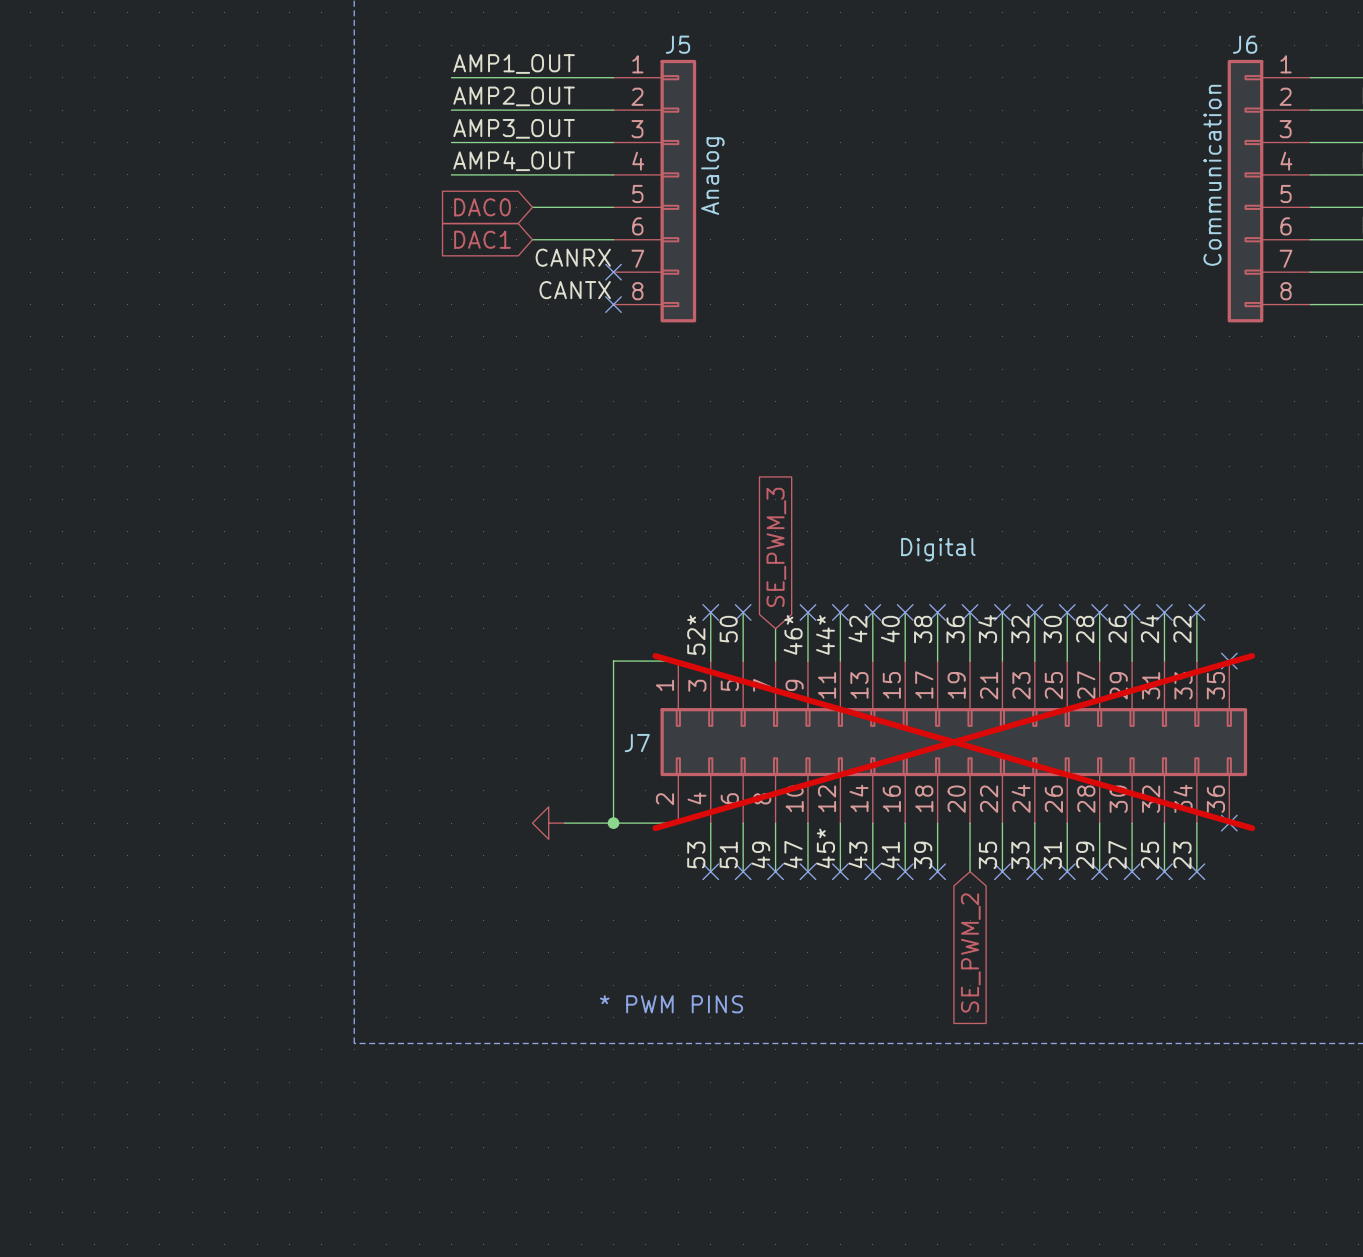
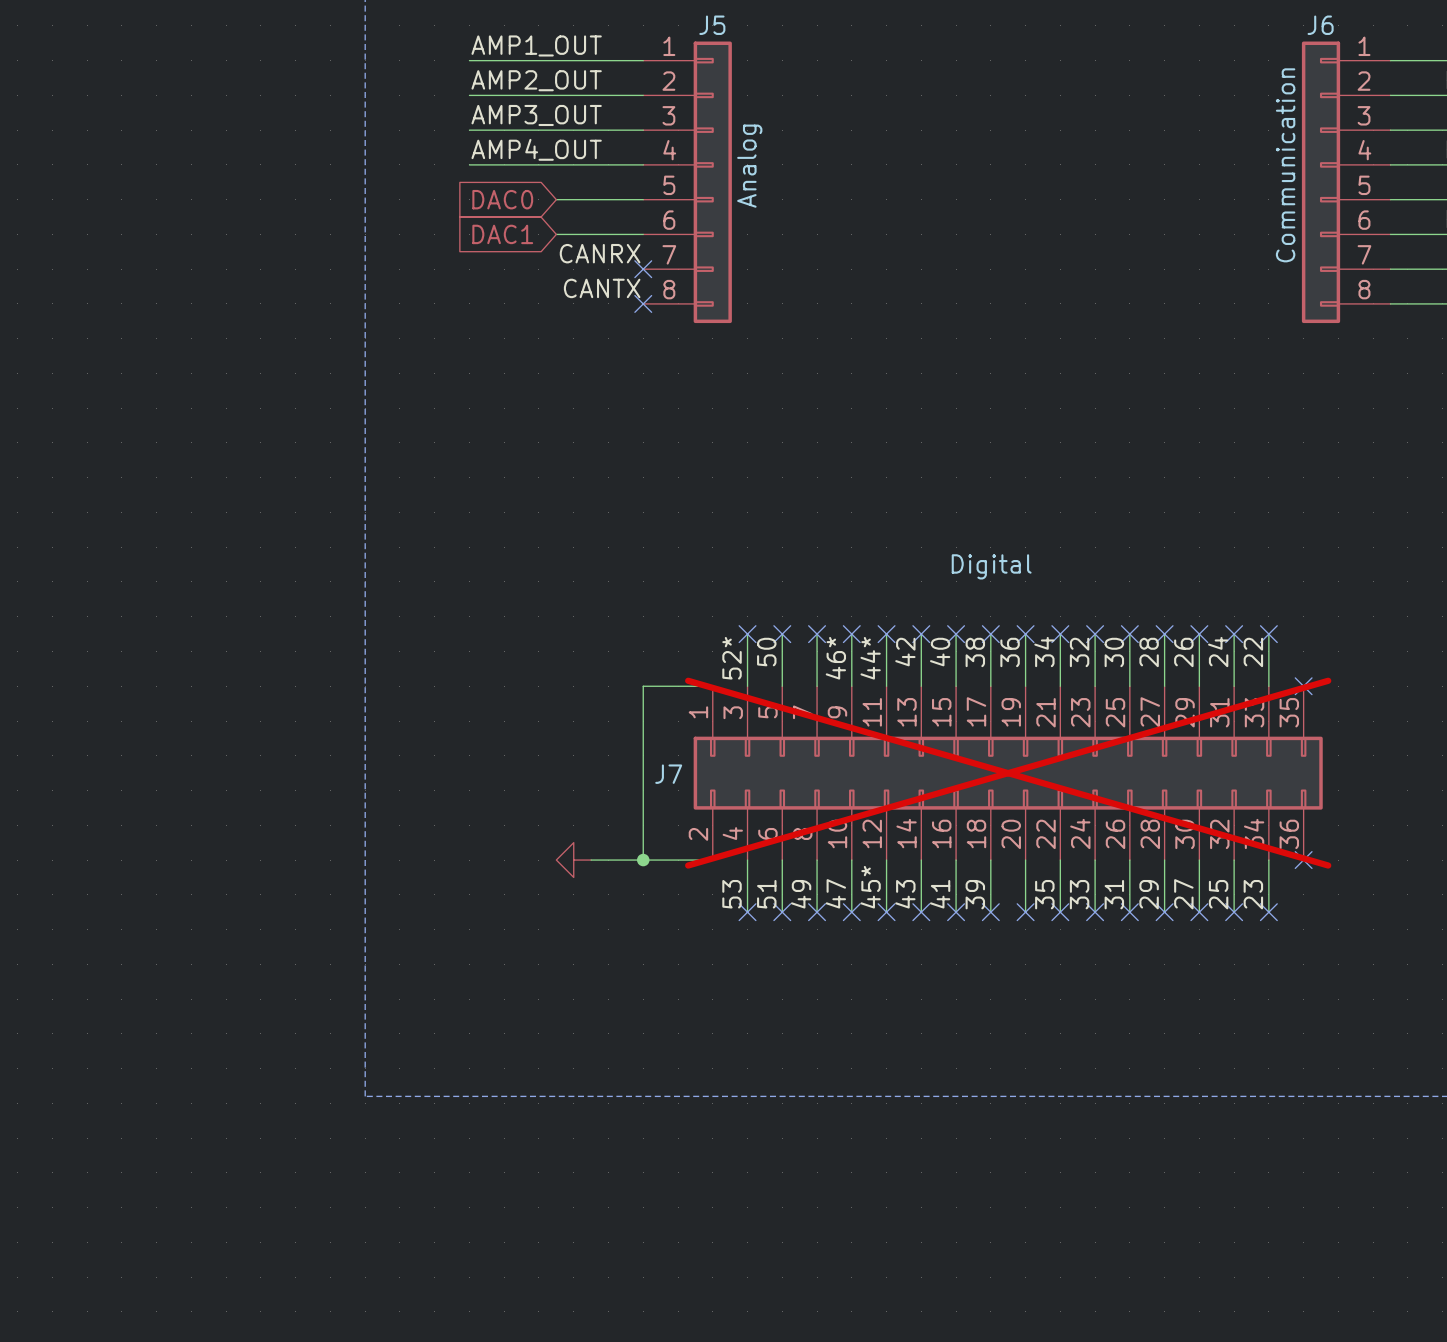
global label: SE_PWM_3 (776, 547) -> none
wire: none -> (817, 634) (817, 651)
no-connect mark: none -> (817, 634)
no-connect mark: none -> (1025, 912)
global label: SE_PWM_2 (970, 952) -> none
text: * PWM PINS (671, 1004) -> none

